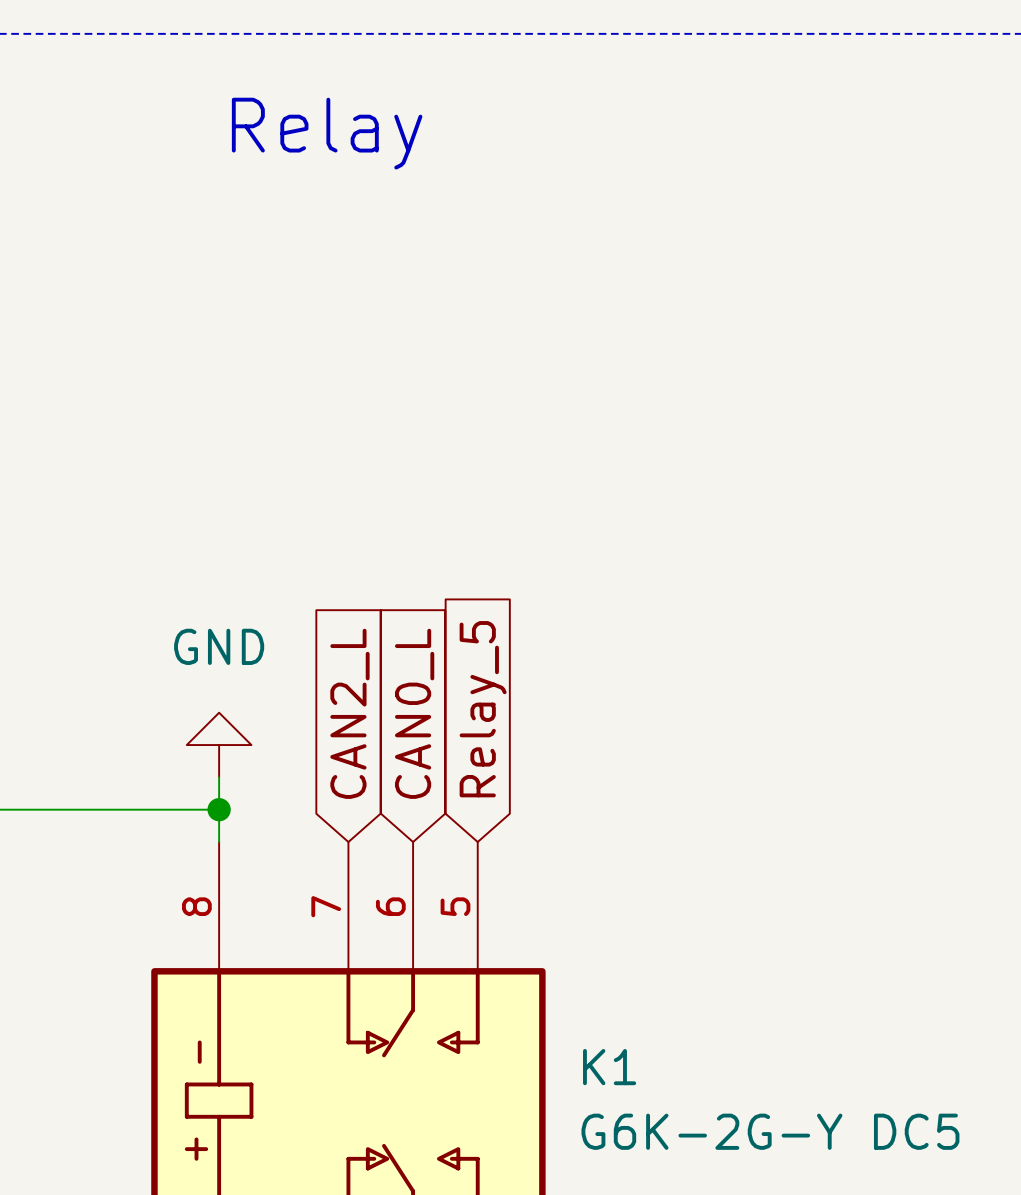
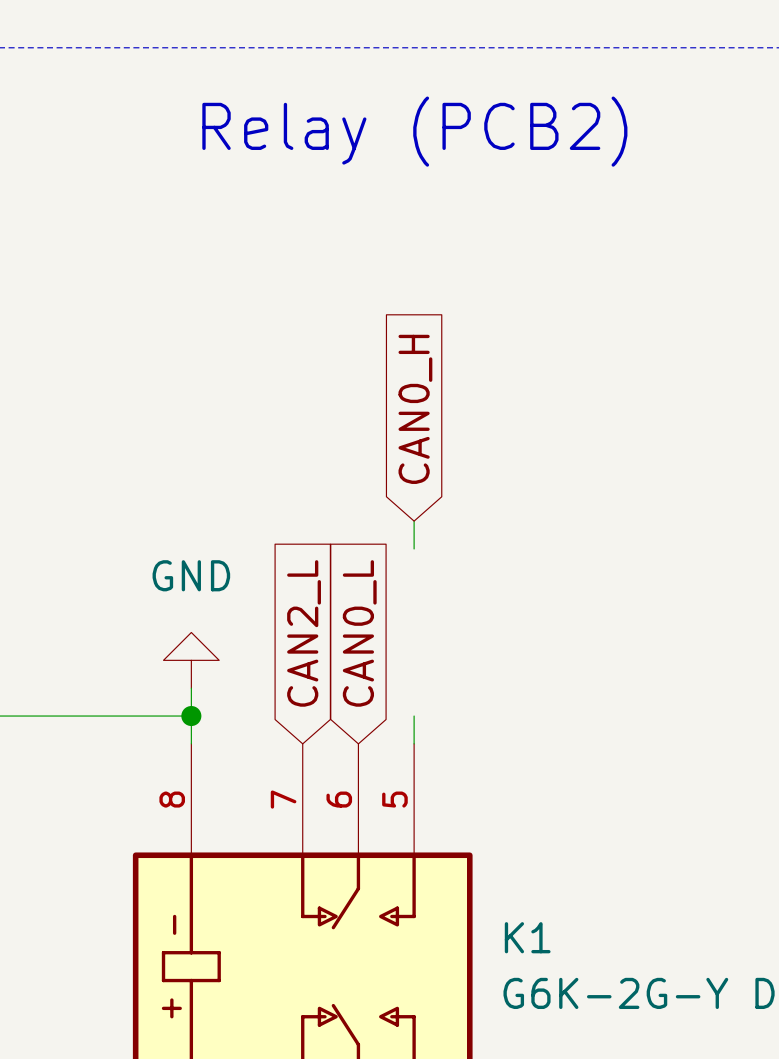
text: Relay (327, 133) -> Relay (PCB2) (414, 131)
global label: none -> CAN0_H (415, 409)
wire: none -> (414, 521) (414, 548)
global label: Relay_5 (483, 709) -> none
wire: none -> (414, 716) (414, 743)

